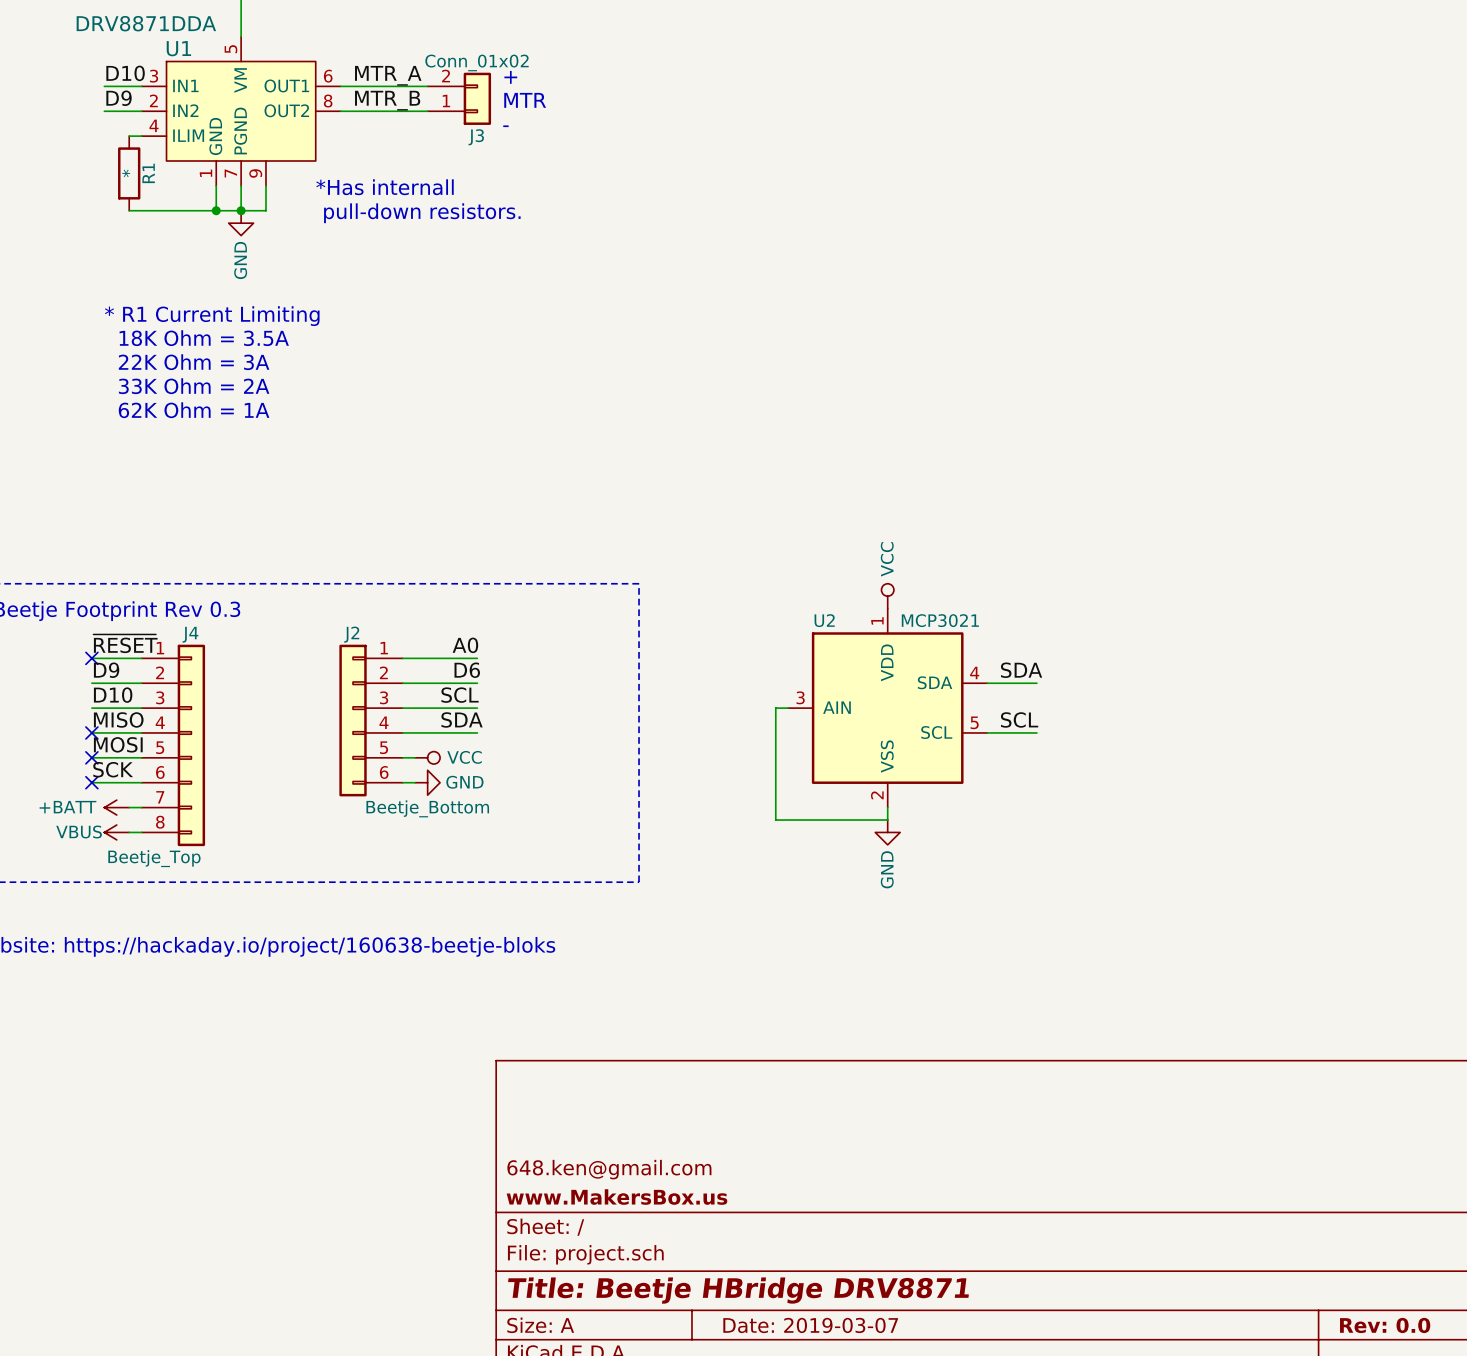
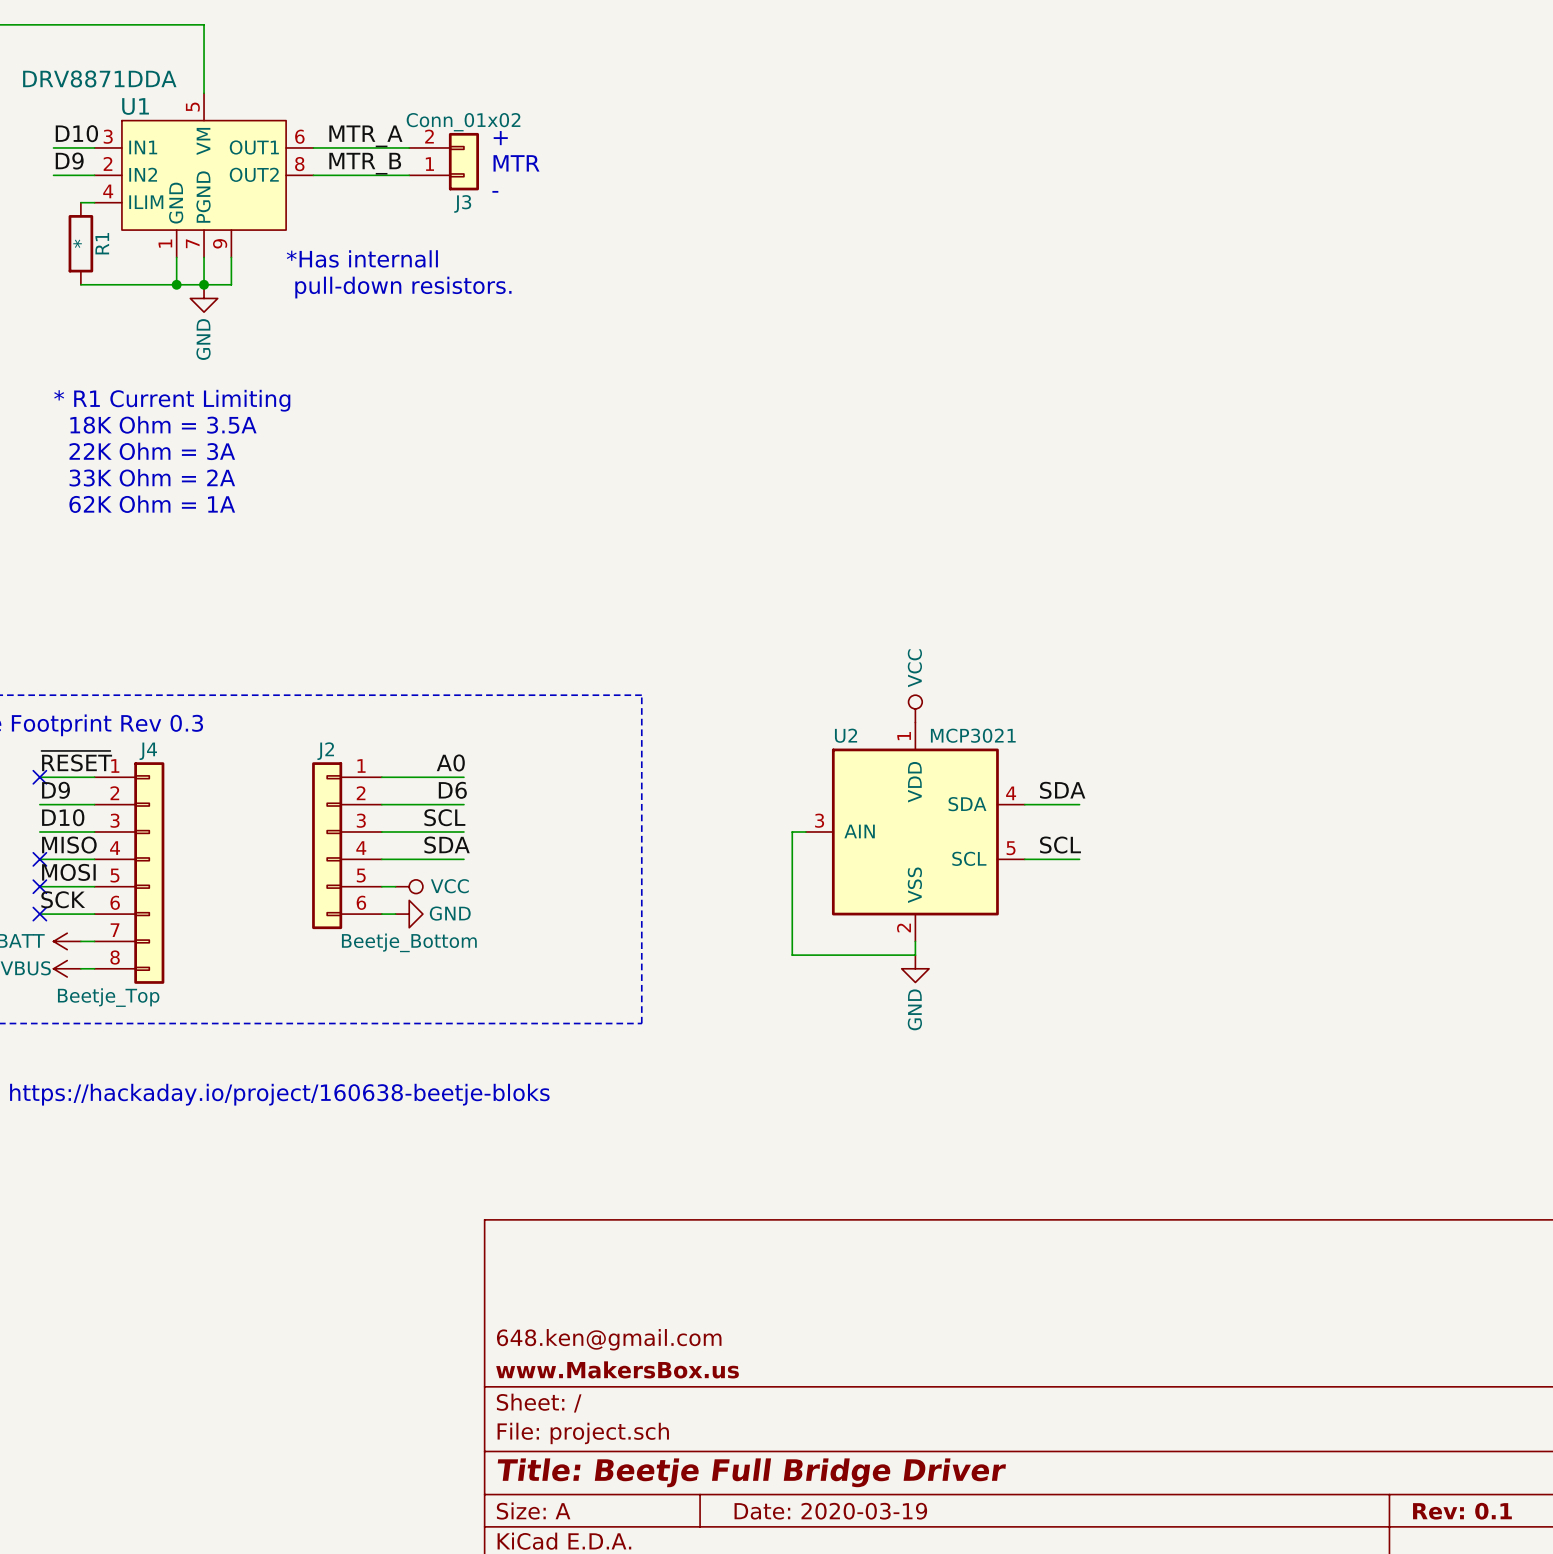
title block: Title: Beetje HBridge DRV8871 (738, 1290) -> Title: Beetje Full Bridge Driver (751, 1472)
title block: Date: 2019-03-07 (810, 1325) -> Date: 2020-03-19 (830, 1511)
title block: Rev: 0.0 (1385, 1325) -> Rev: 0.1 (1462, 1511)

